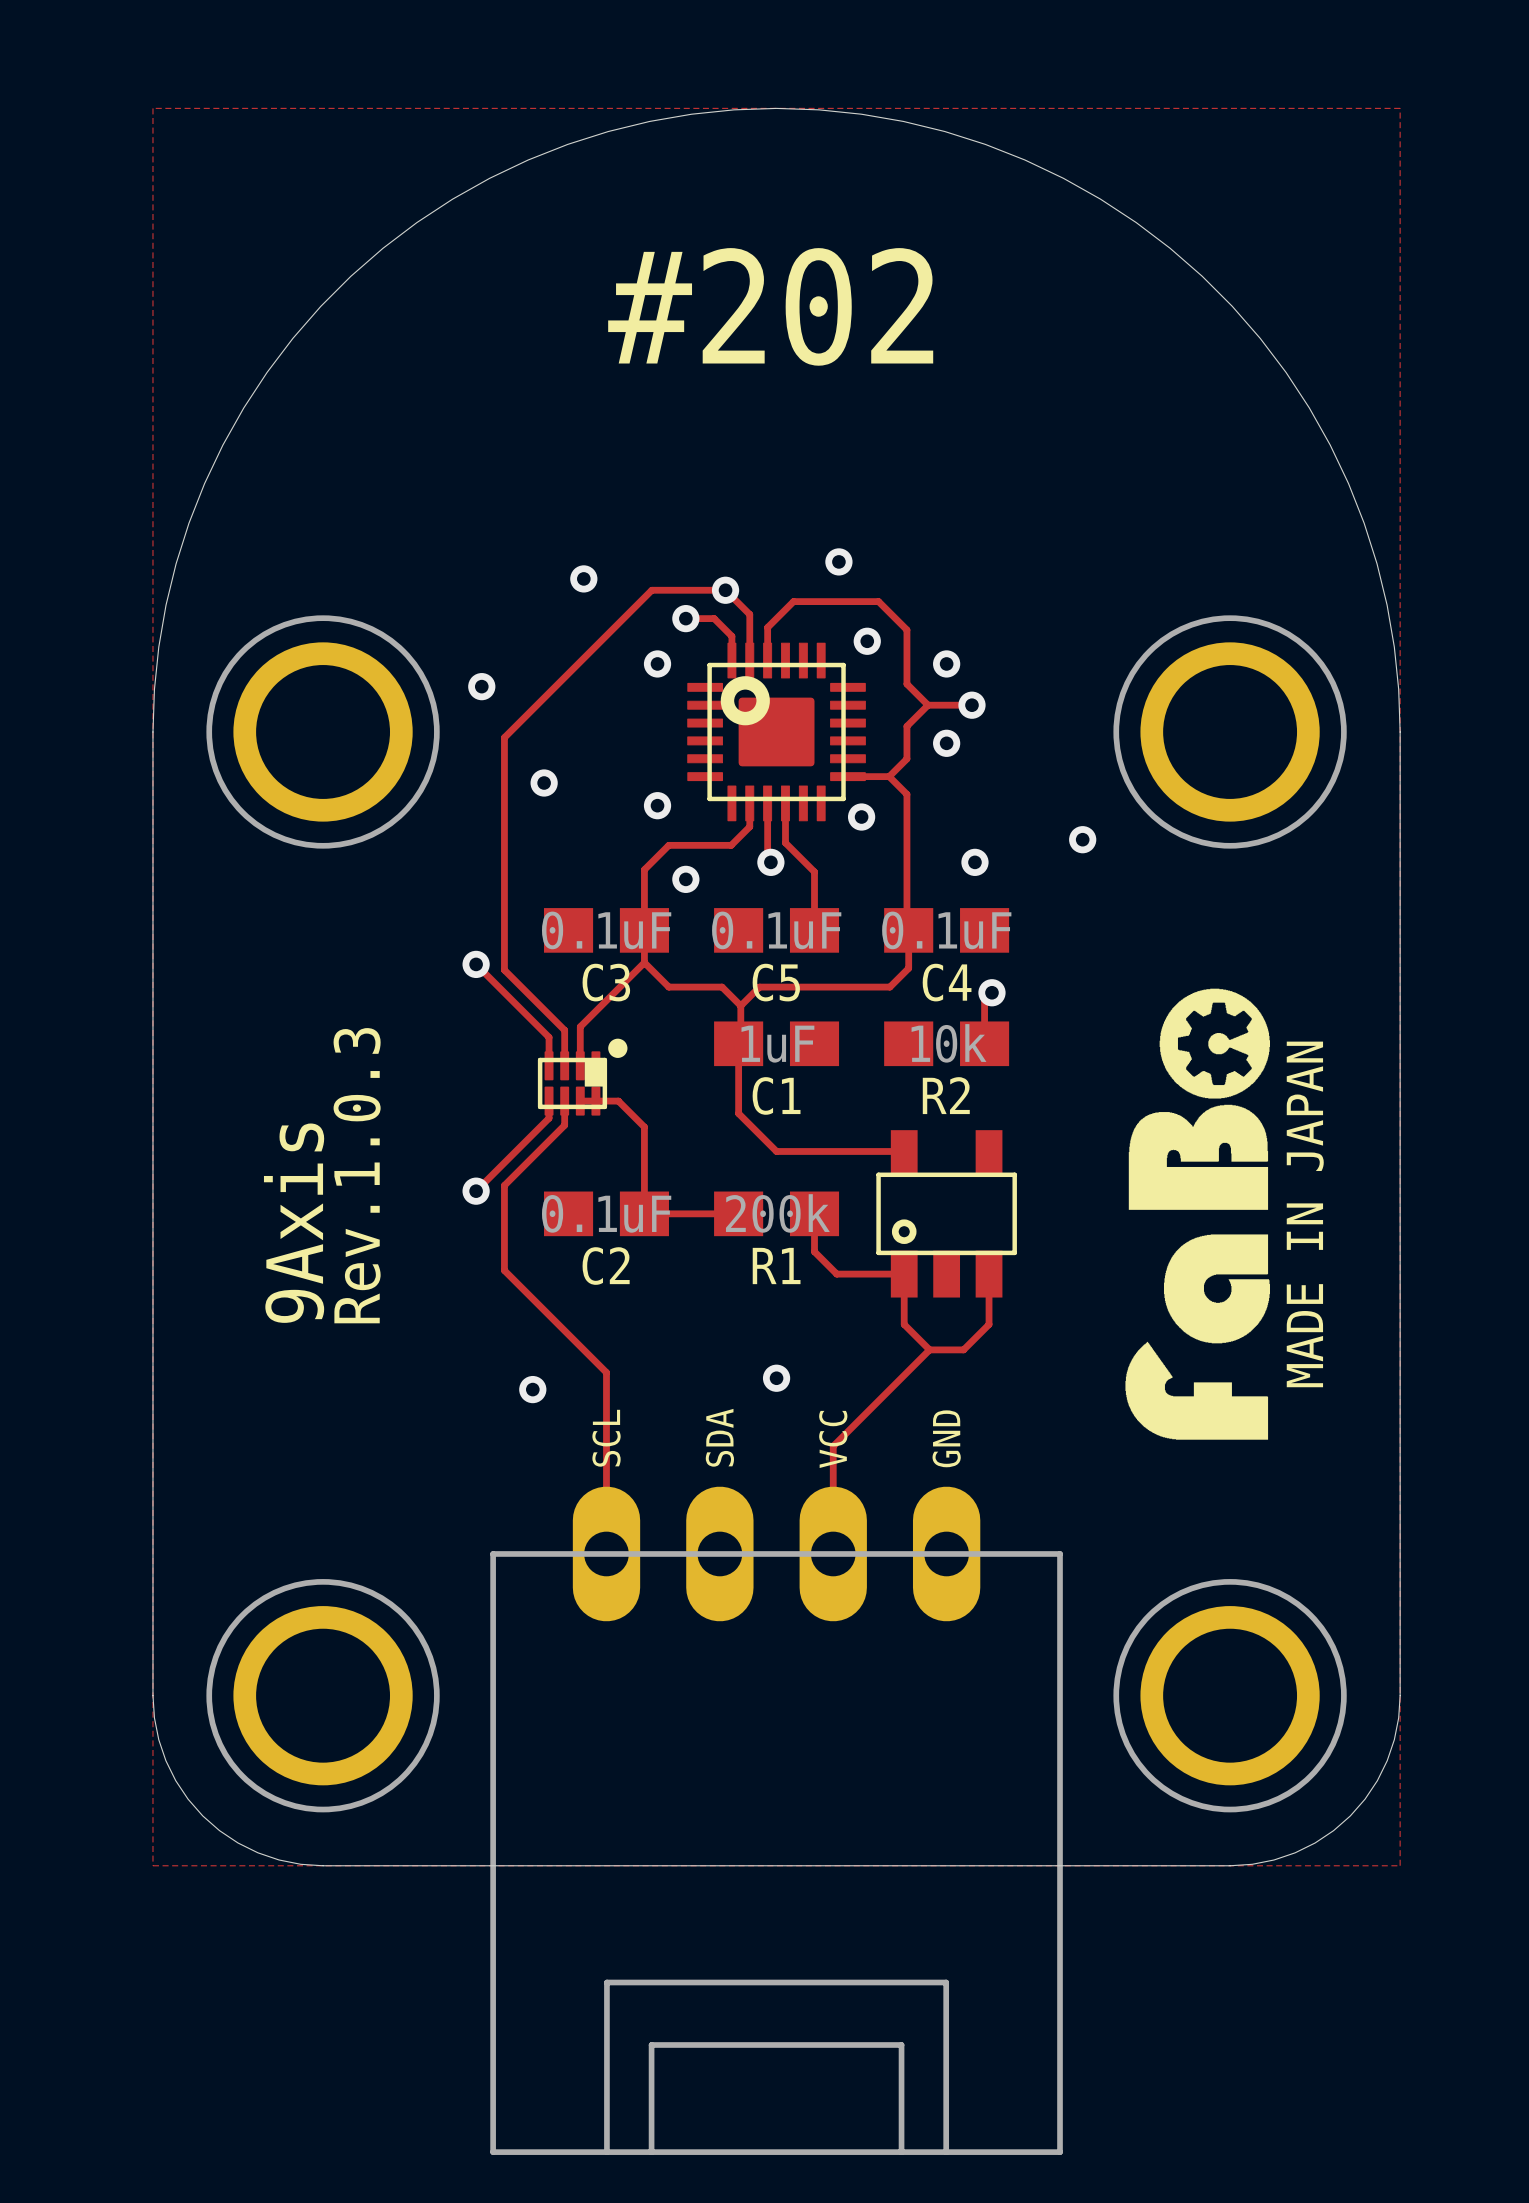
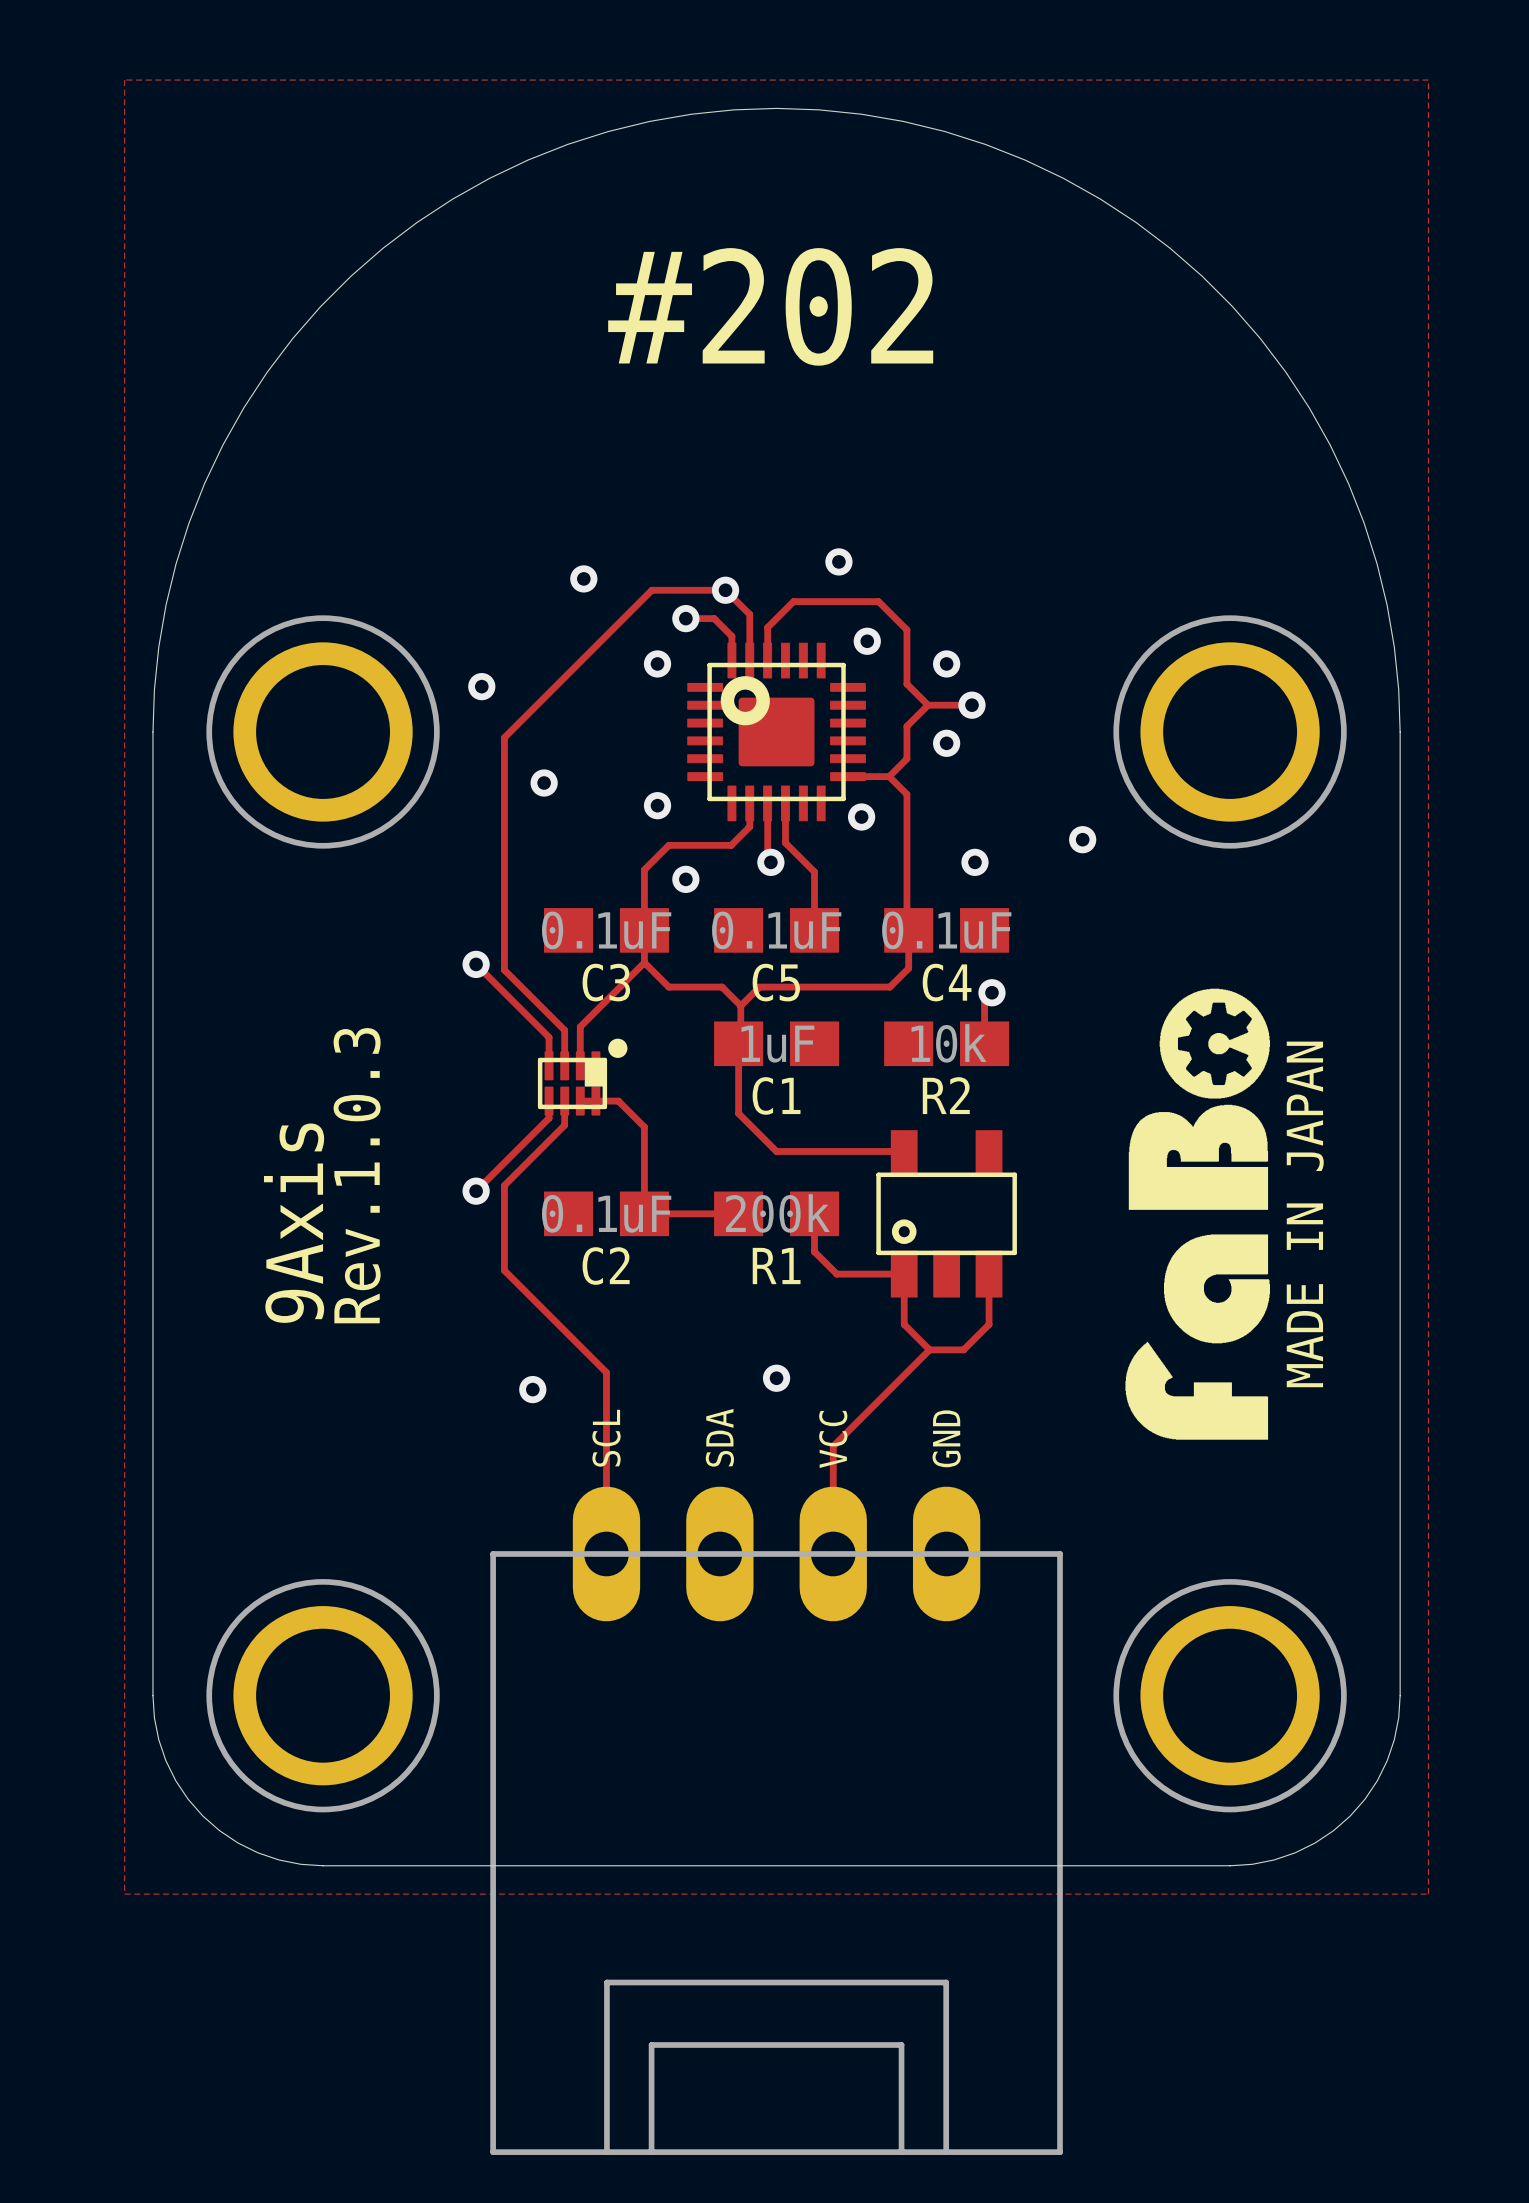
zone outline: (152, 108) (1400, 108) (1400, 1865) (152, 1865) (152, 108) -> (124, 80) (124, 1894) (1428, 1894) (1428, 80) (124, 80)

